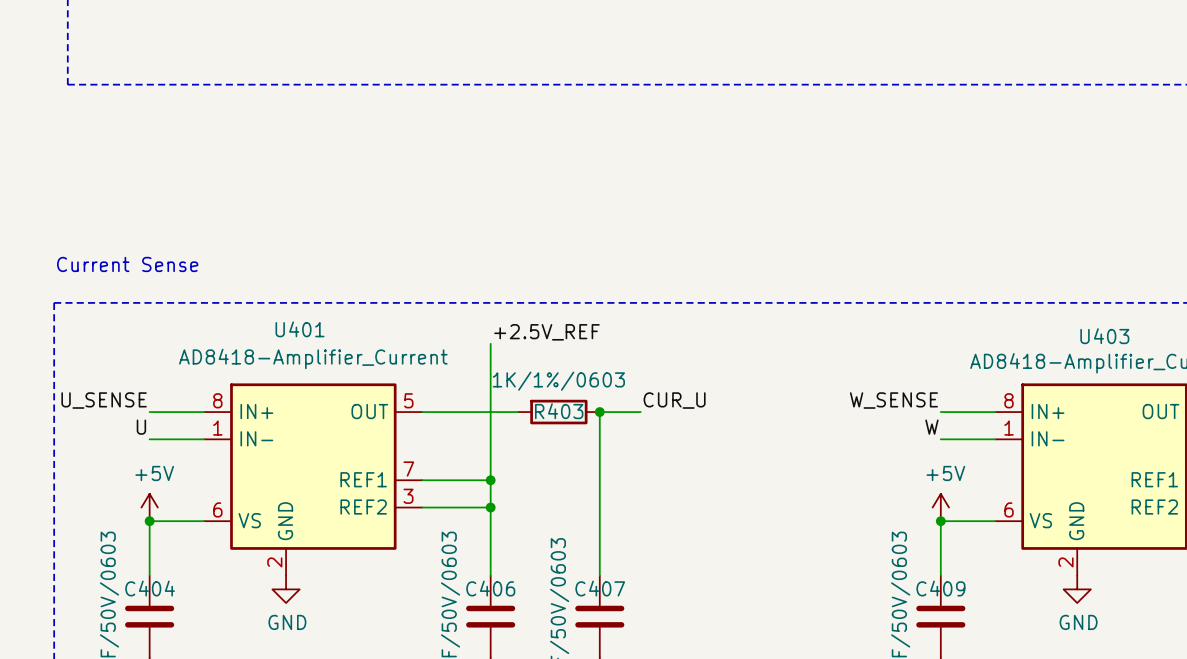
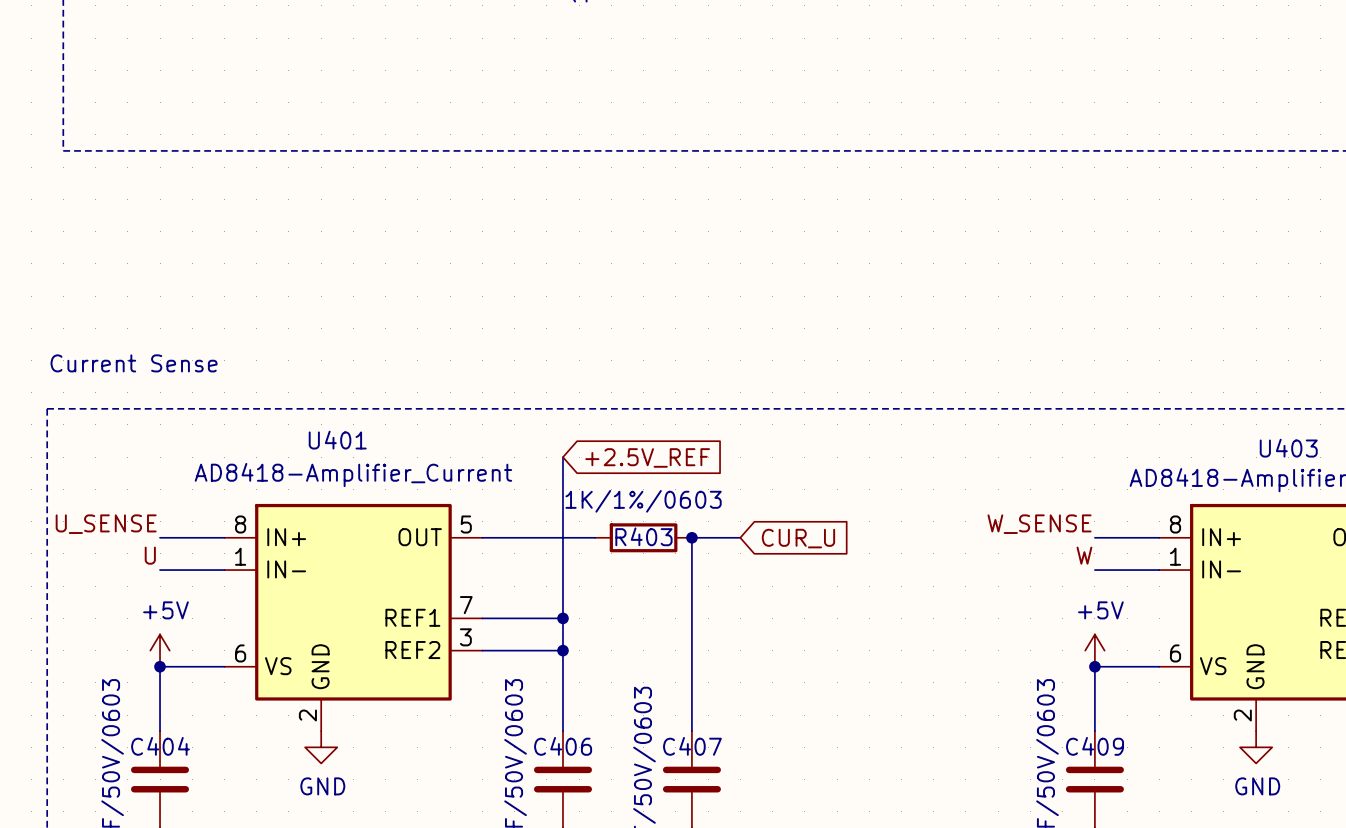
label: +2.5V_REF (546, 332) -> none
global label: none -> +2.5V_REF (647, 457)
label: CUR_U (674, 400) -> none
global label: none -> CUR_U (798, 538)

